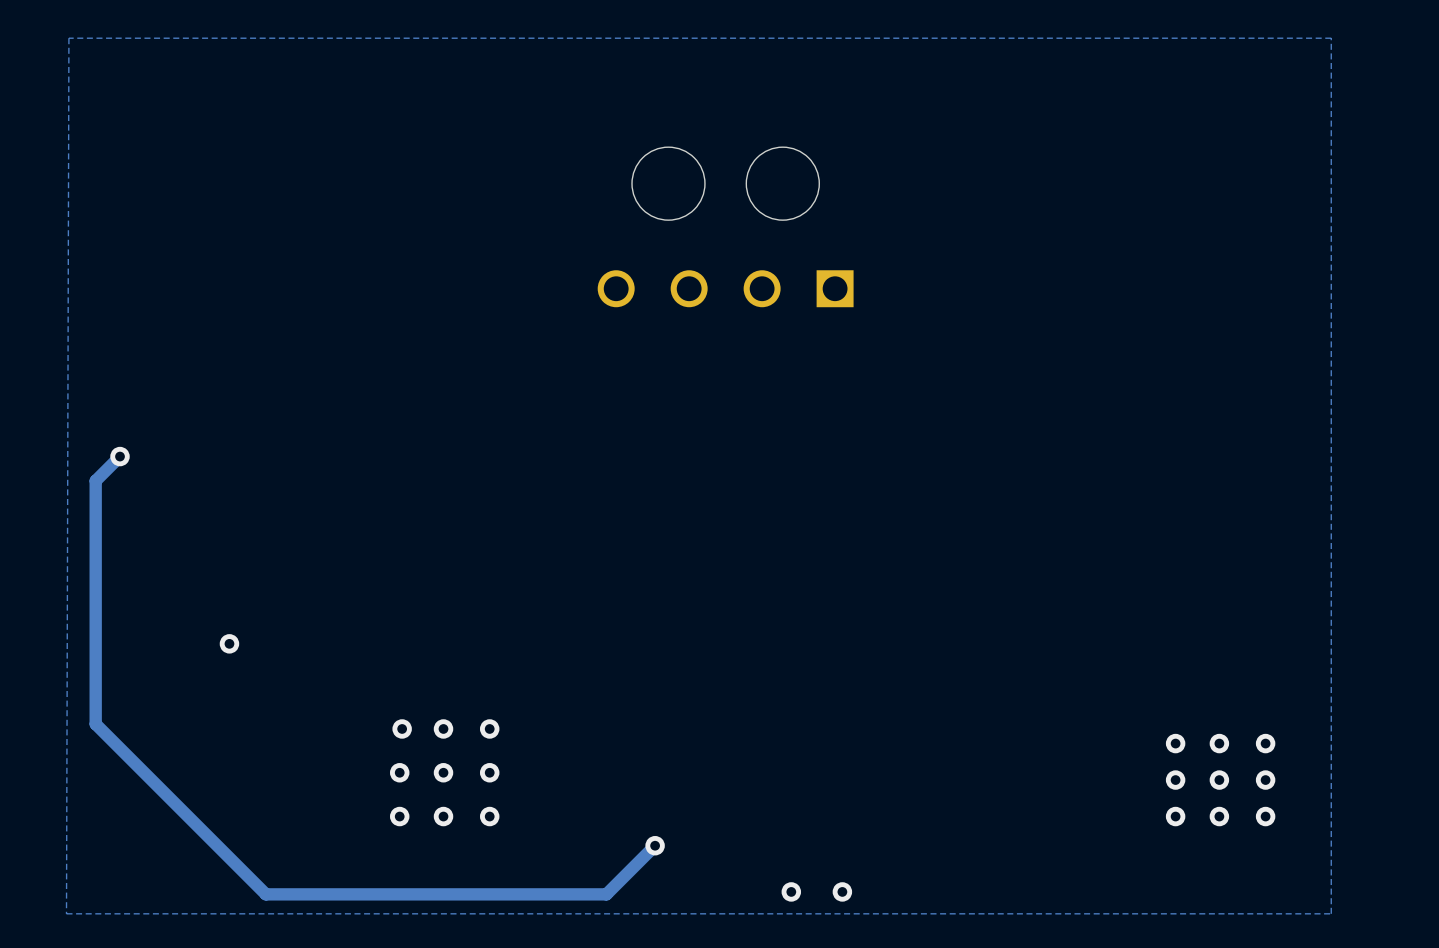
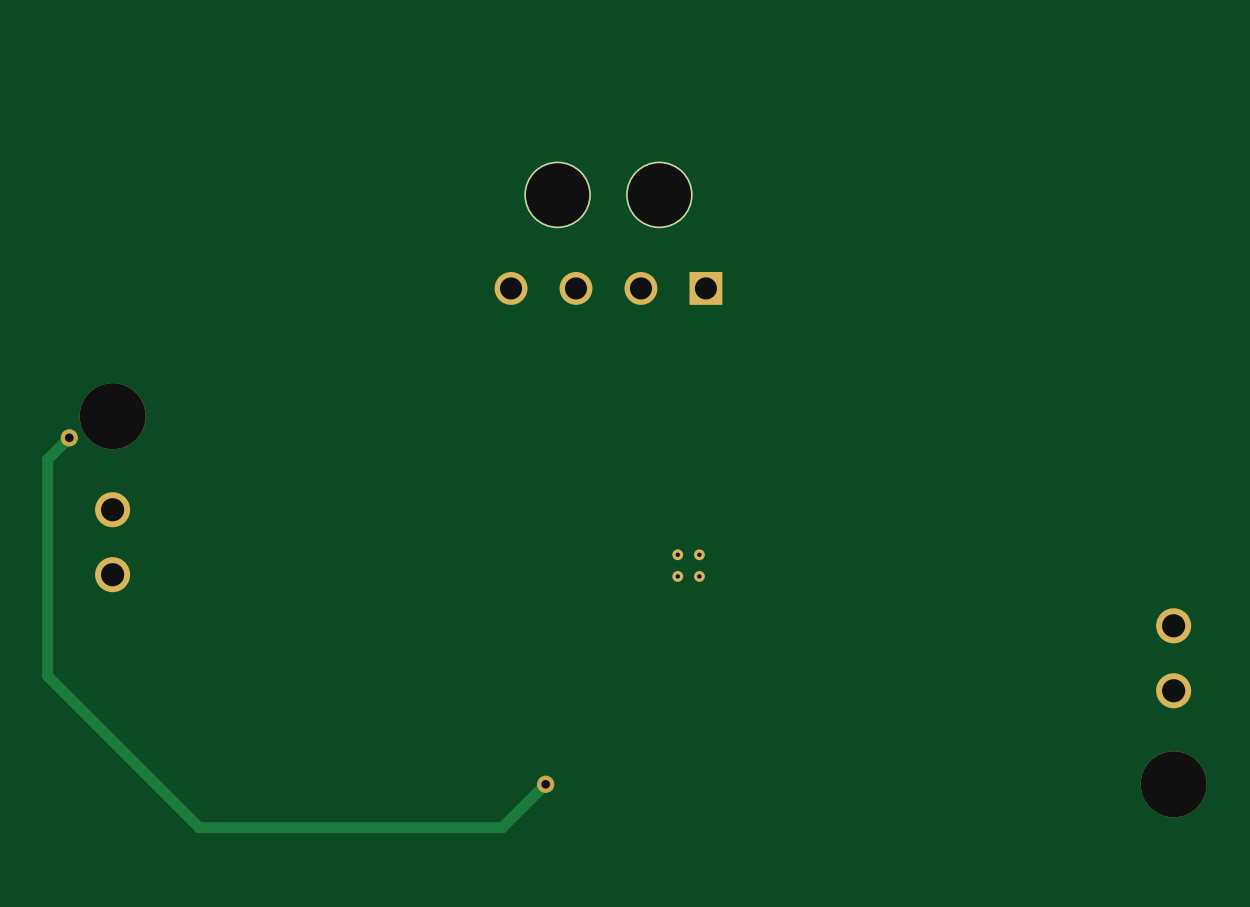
zone outline: (1331, 38) (68, 38) (66, 913) (1331, 913) (1331, 38) -> none
part: none -> (112, 487)
part: none -> (688, 565)
via: (229, 643) -> none
via: (402, 728) -> none
via: (443, 728) -> none
via: (489, 728) -> none
via: (1175, 743) -> none
via: (1219, 743) -> none
via: (1265, 743) -> none
part: none -> (1173, 712)
via: (399, 772) -> none
via: (443, 772) -> none
via: (489, 772) -> none
via: (1175, 780) -> none
via: (1219, 780) -> none
via: (1265, 780) -> none
via: (399, 816) -> none
via: (443, 816) -> none
via: (489, 816) -> none
via: (1175, 816) -> none
via: (1219, 816) -> none
via: (1265, 816) -> none
via: (791, 891) -> none
via: (842, 891) -> none

